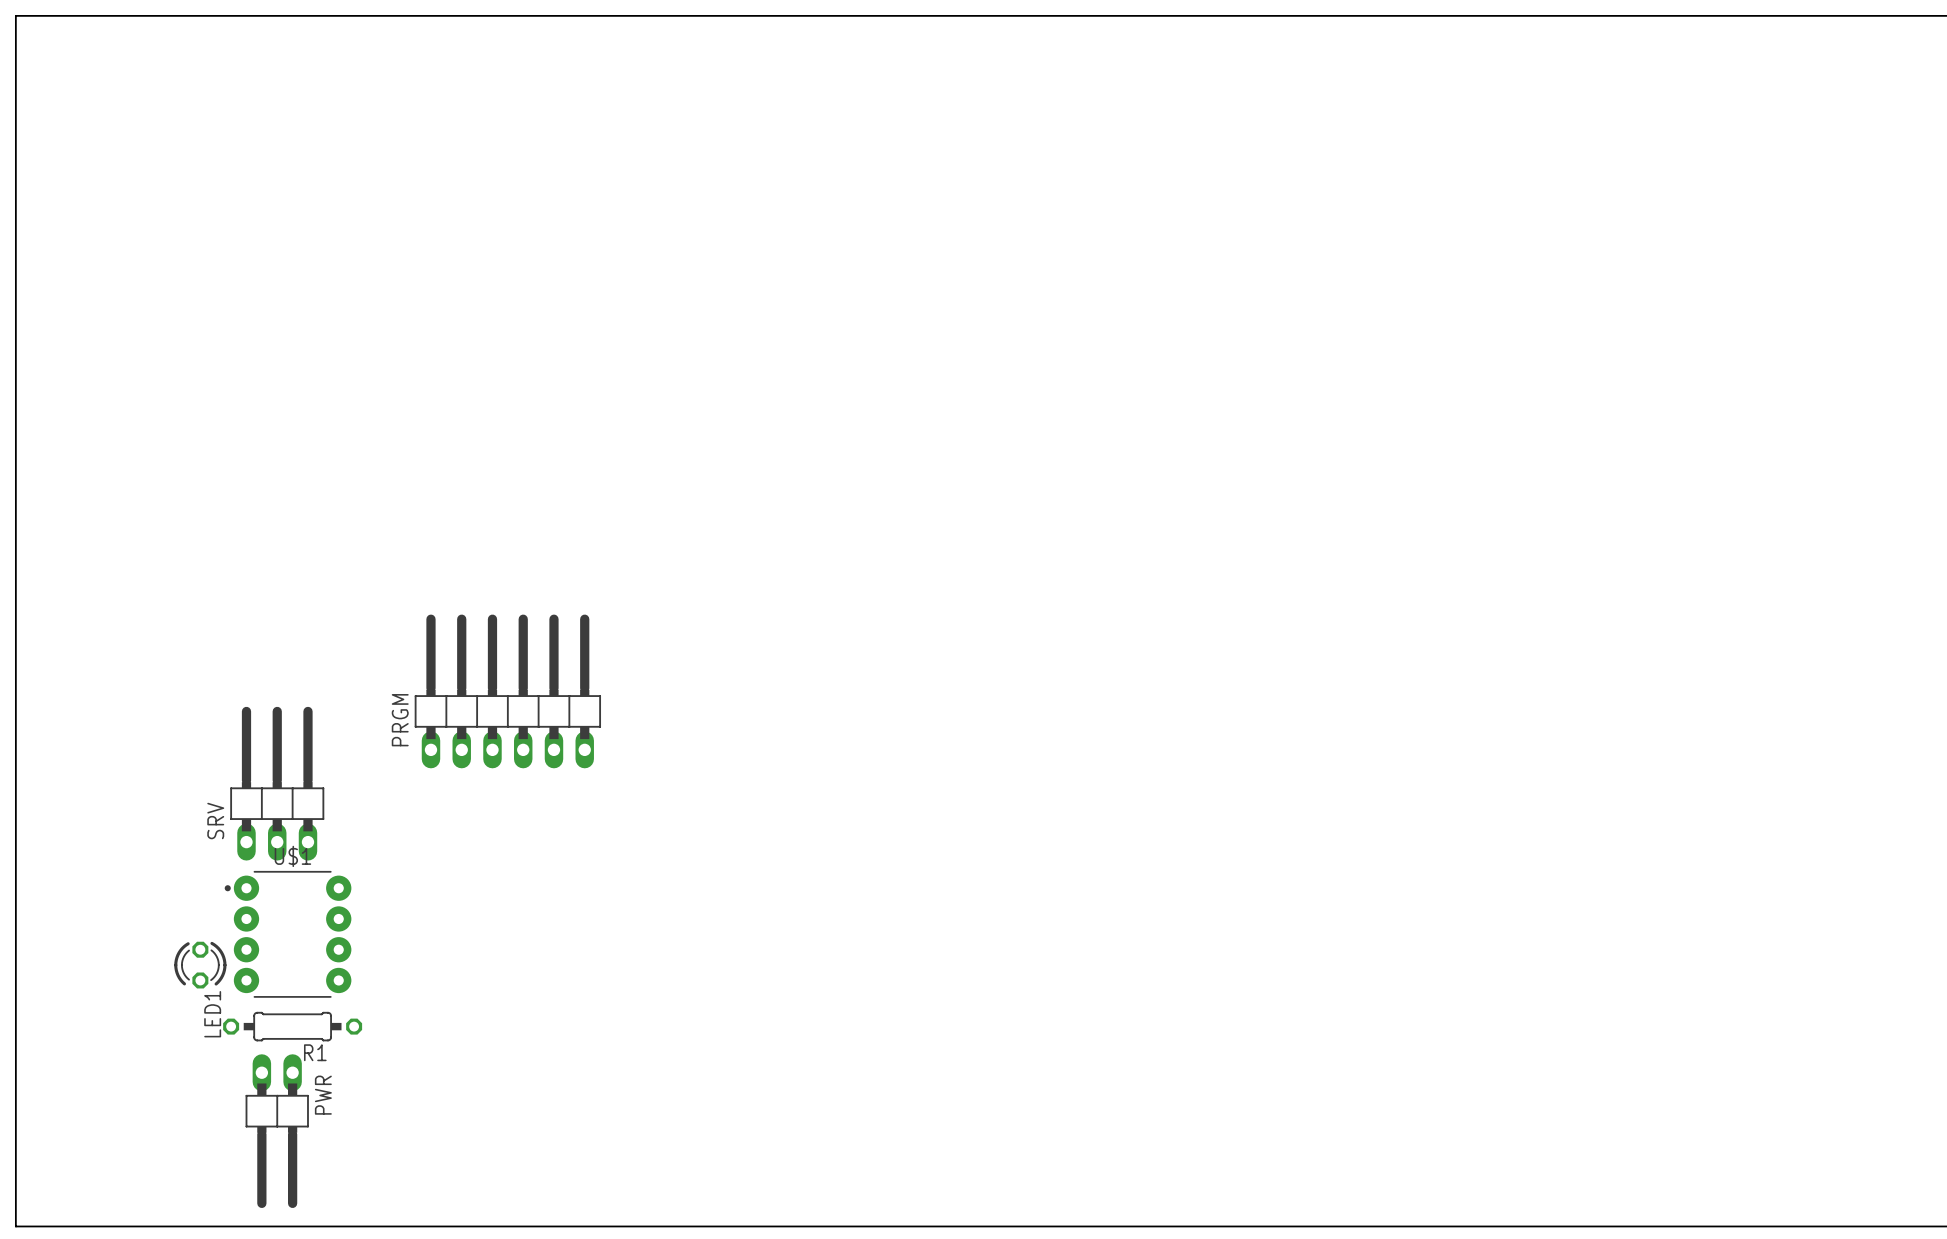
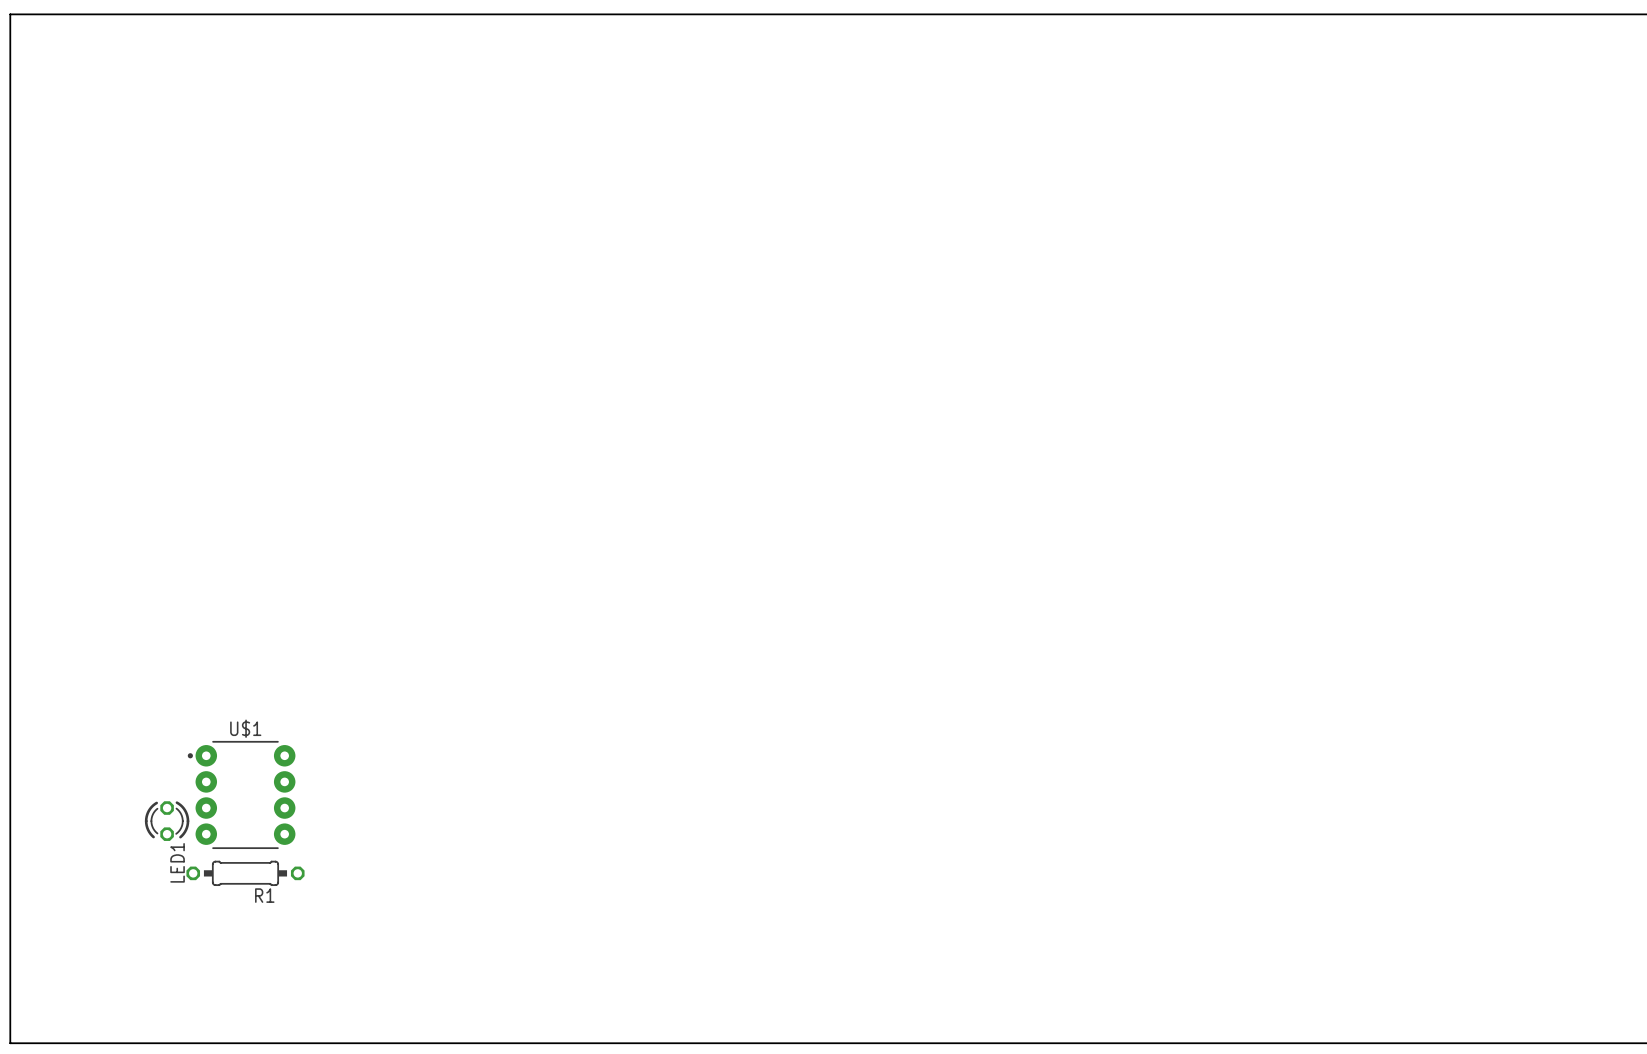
PRGM: (507, 691) -> none
SRV: (277, 783) -> none
PWR: (277, 1131) -> none

